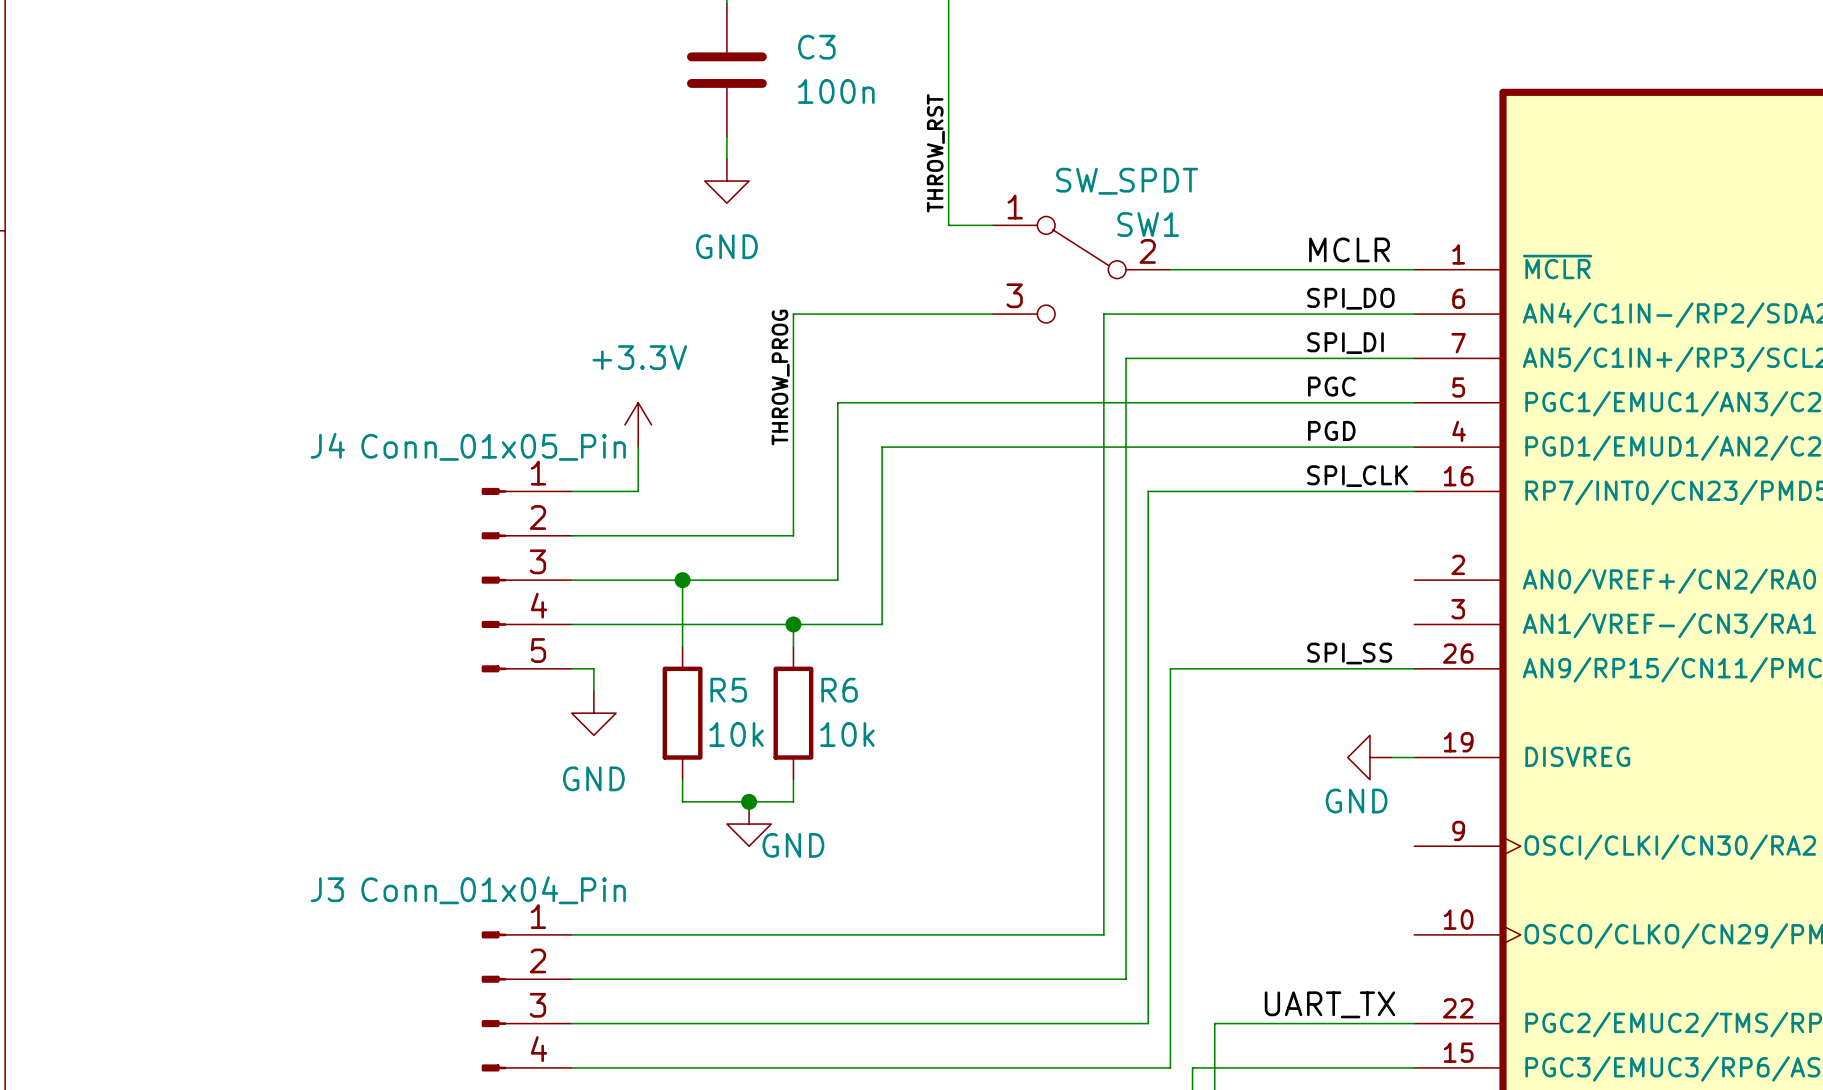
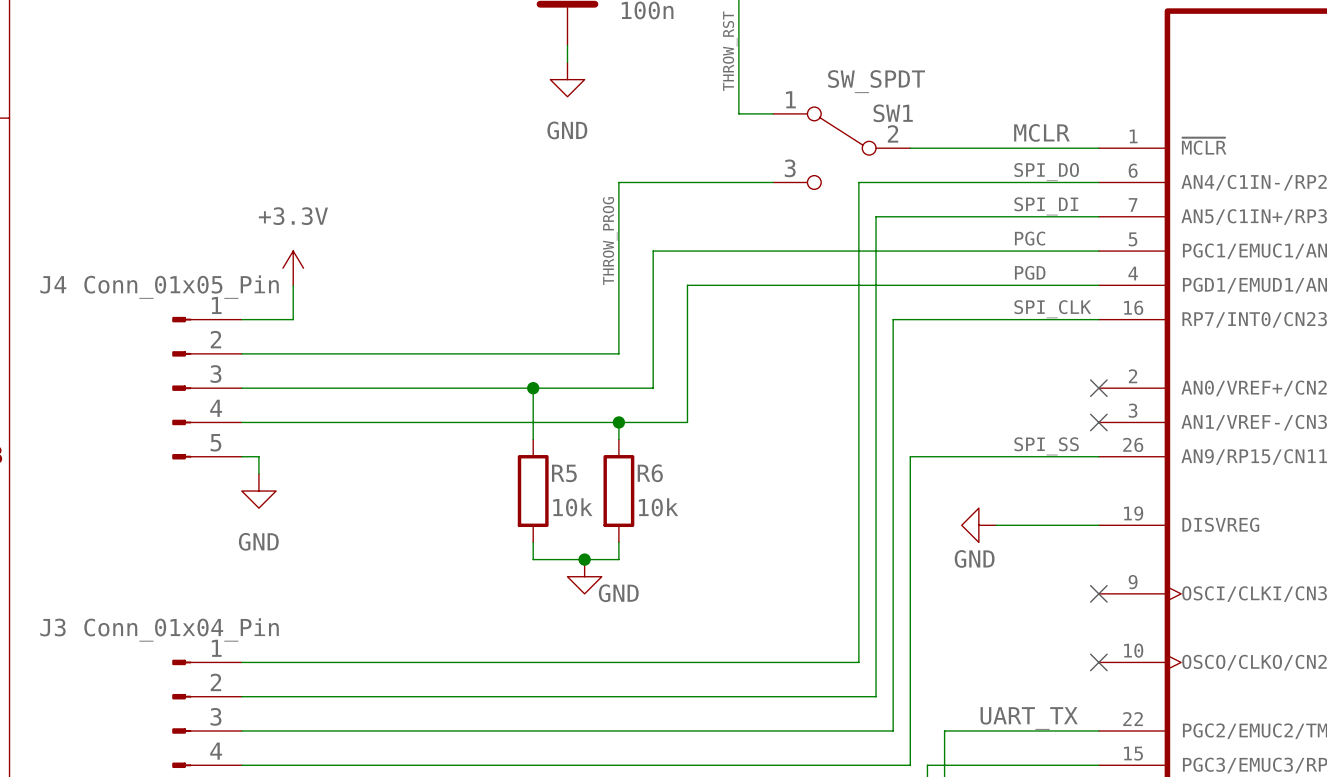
power symbol position: +3.3V (638, 424) -> +3.3V (293, 268)
wire: (638, 447) (638, 491) (571, 491) -> (293, 285) (293, 319) (241, 319)
wire: none -> (241, 353) (447, 353)
wire: none -> (241, 388) (447, 388)
J4 position: (526, 580) -> (207, 388)
no-connect mark: none -> (1098, 388)
wire: none -> (241, 422) (447, 422)
no-connect mark: none -> (1098, 422)
wire: (571, 668) (593, 668) (593, 691) -> (241, 456) (258, 456) (258, 473)
power symbol position: GND (593, 713) -> GND (258, 491)
wire: none -> (996, 525) (1081, 525)
power symbol position: GND (1369, 757) -> GND (978, 525)
no-connect mark: none -> (1098, 593)
wire: none -> (241, 662) (447, 662)
no-connect mark: none -> (1098, 662)
wire: none -> (241, 696) (447, 696)
J3 position: (526, 1001) -> (207, 713)
wire: none -> (241, 730) (447, 730)
wire: none -> (241, 765) (447, 765)

